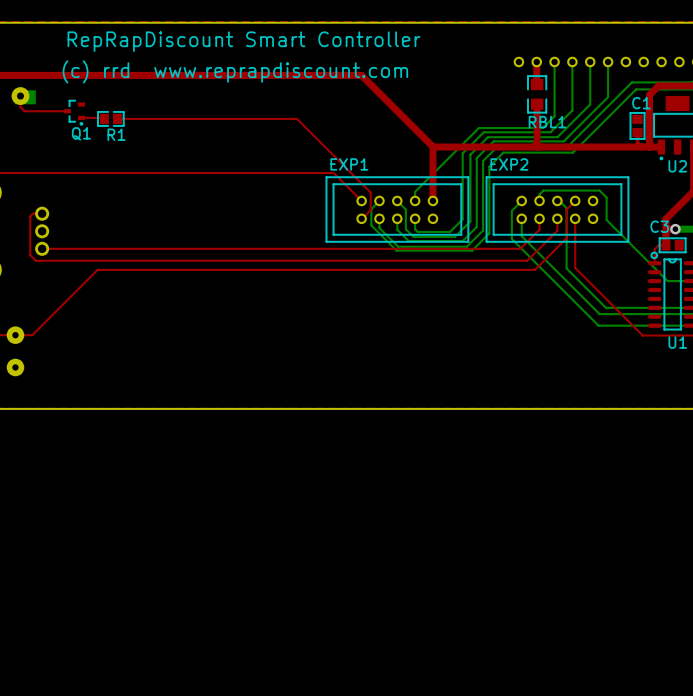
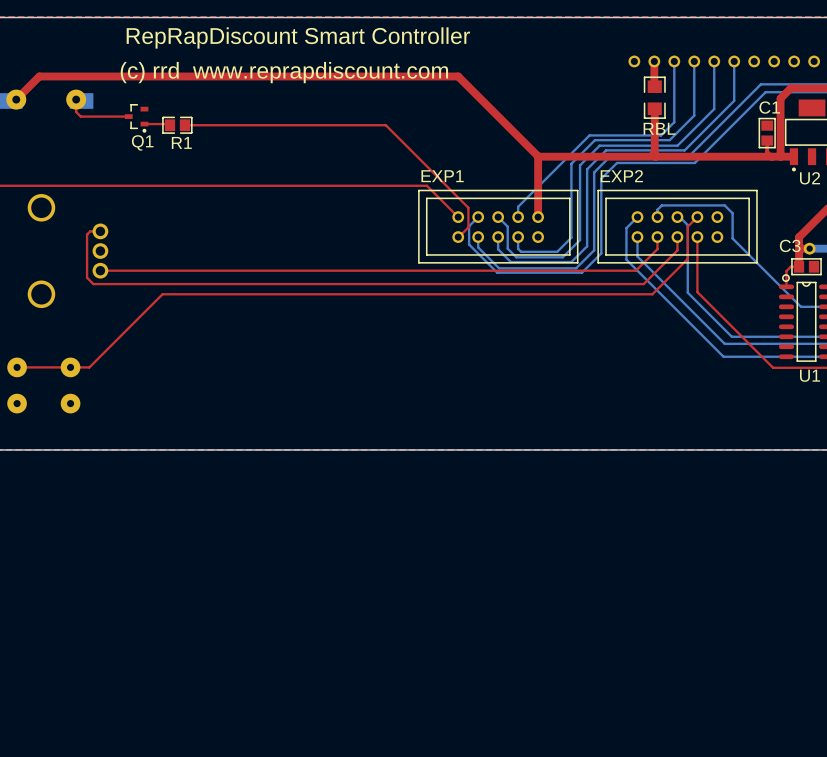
RBL1 name: RBL1 (547, 122) -> RBL (659, 128)
part: none -> (809, 248)
via: (675, 229) -> none

